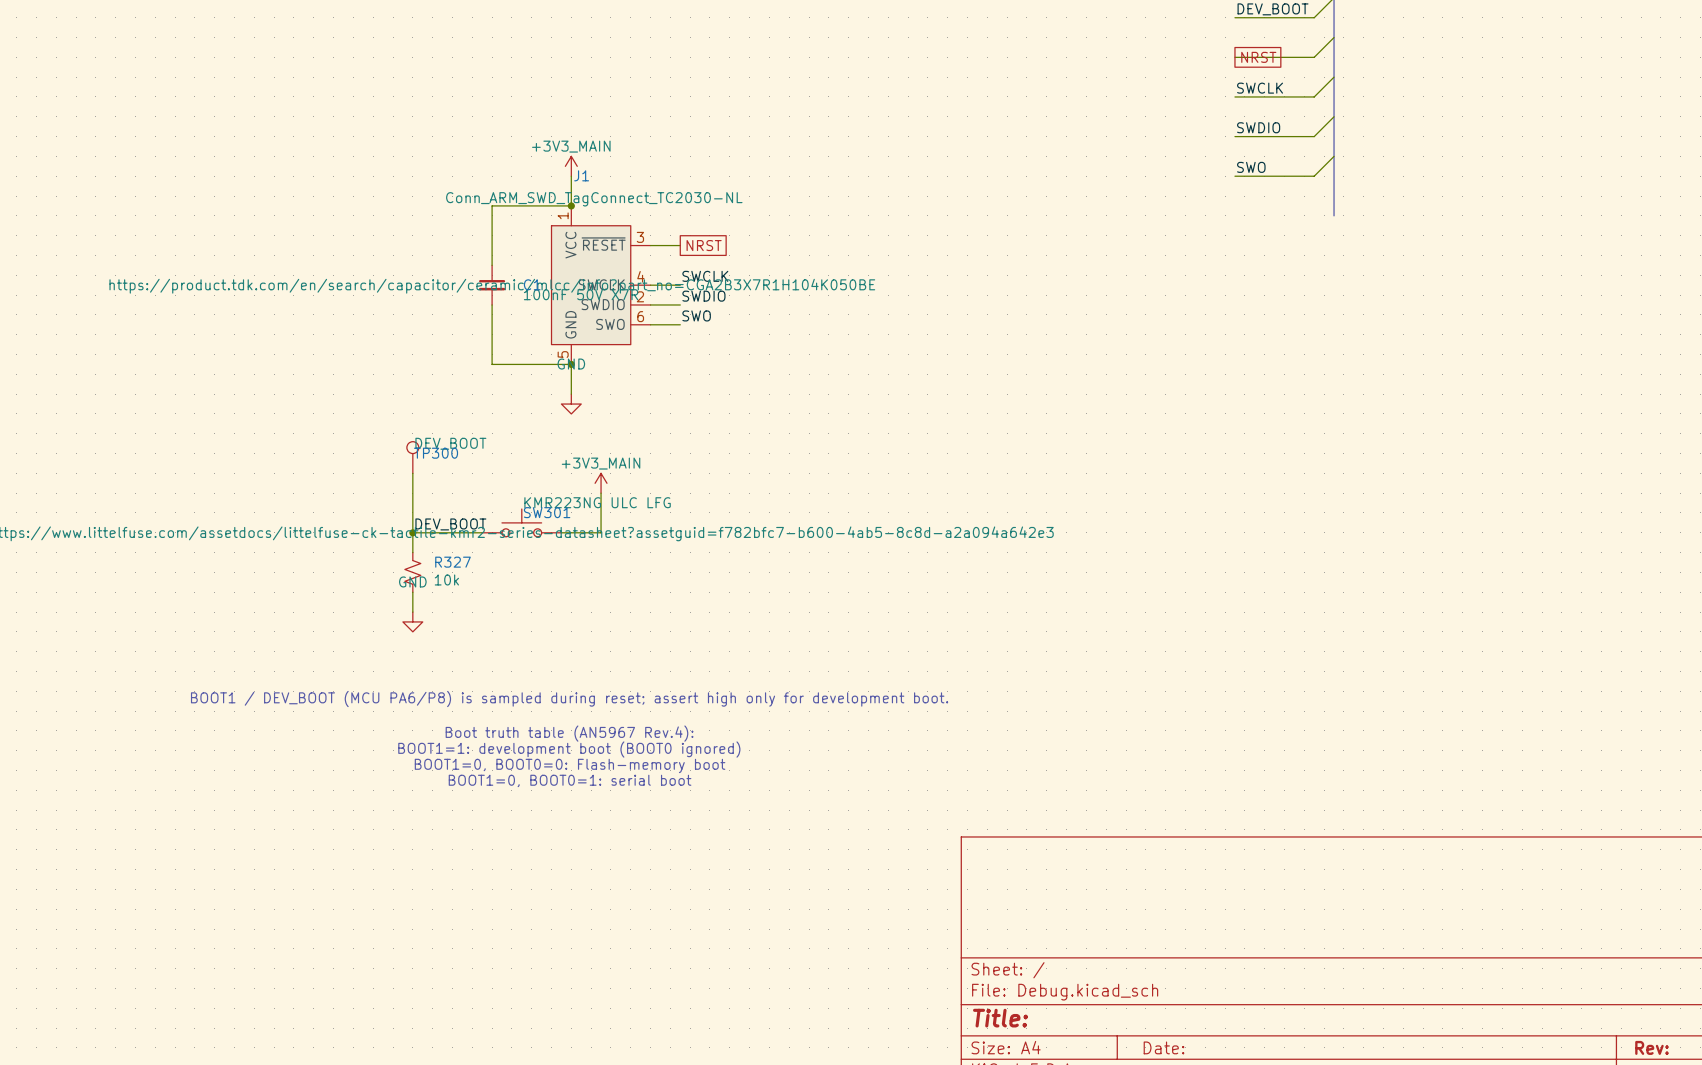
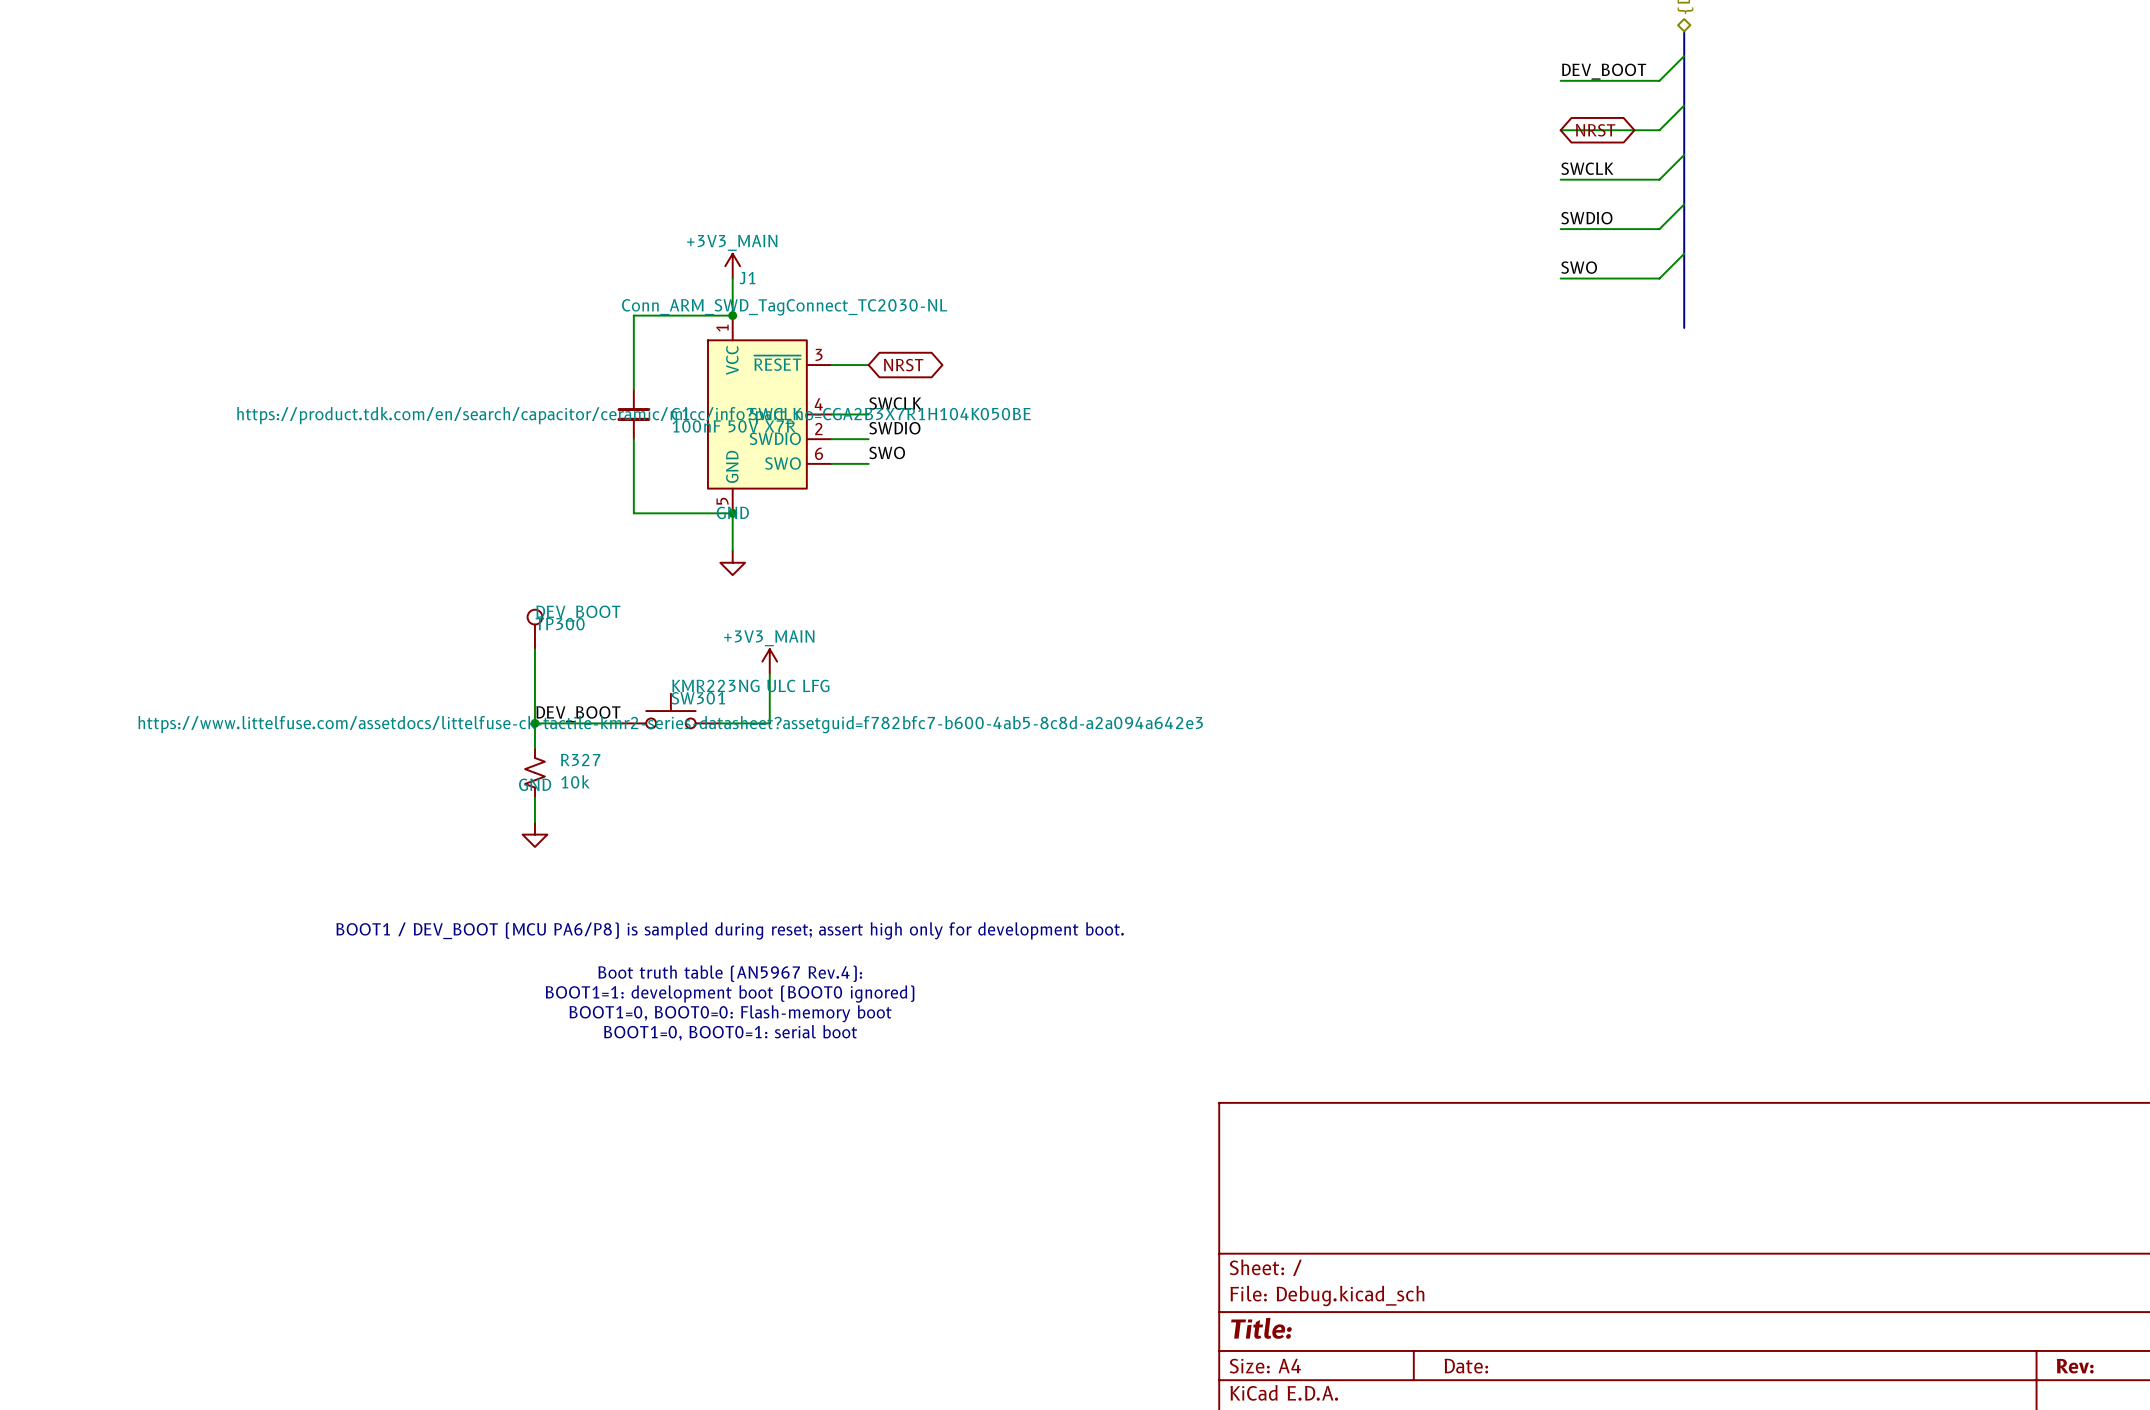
global label shape: passive (1258, 57) -> bidirectional (1595, 130)
global label shape: passive (704, 245) -> bidirectional (903, 365)

